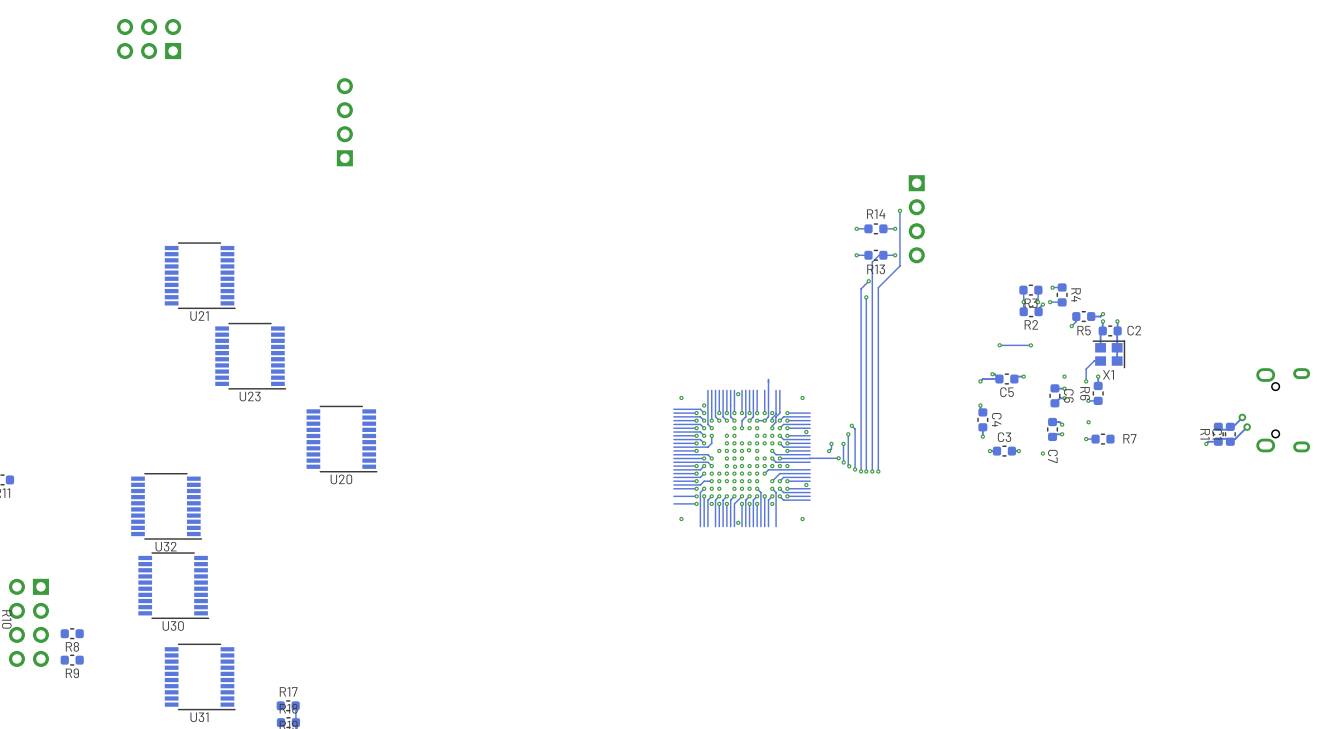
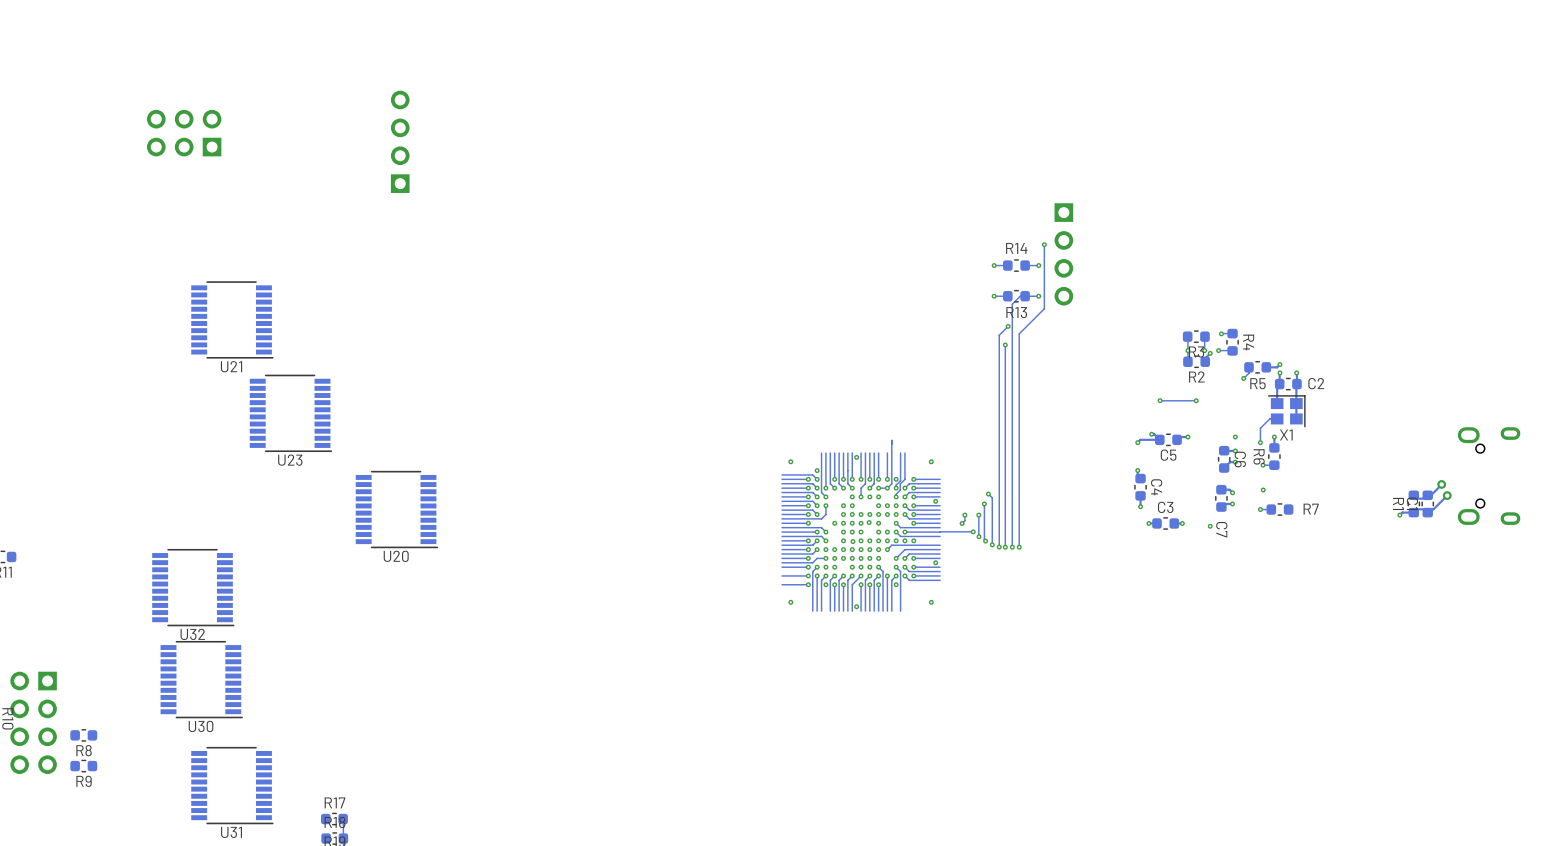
part position: (149, 39) -> (184, 133)

